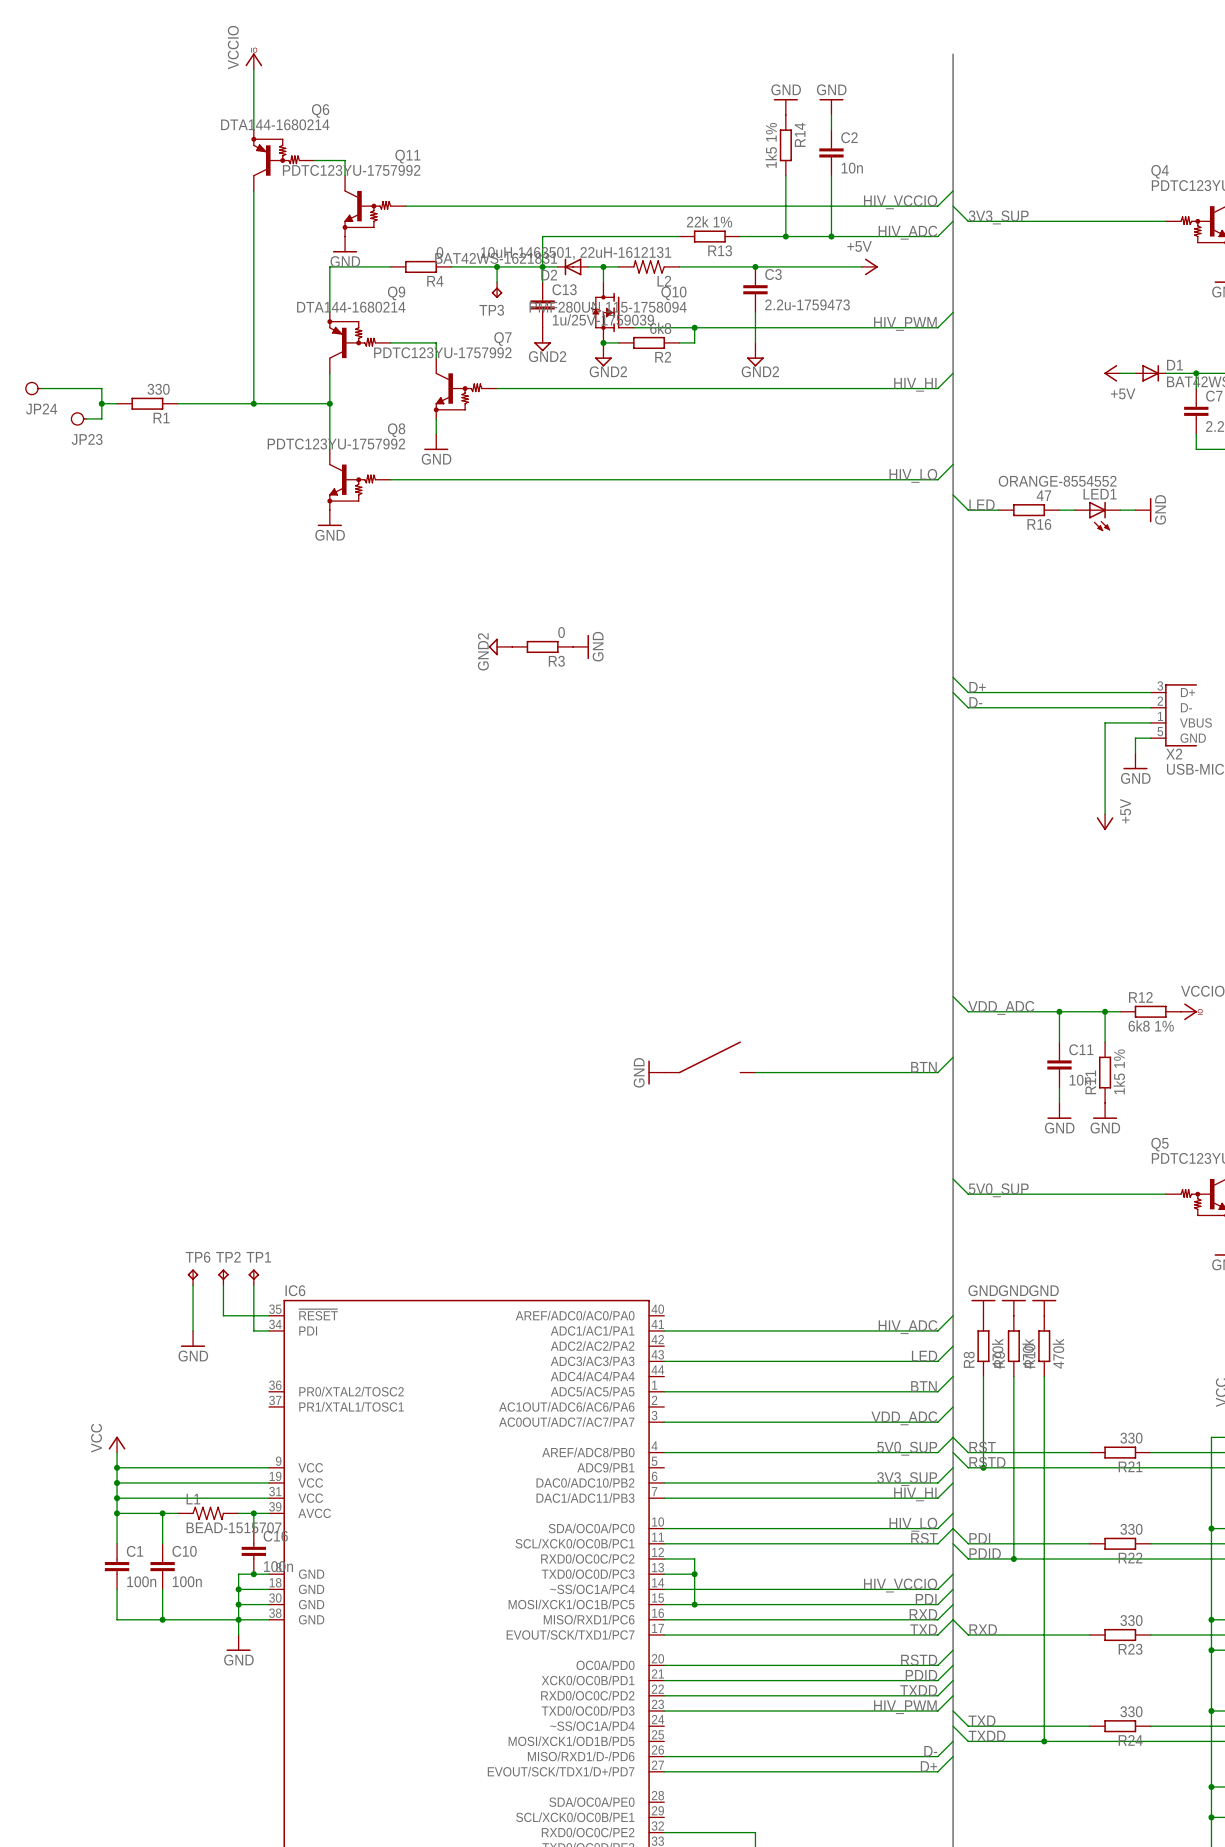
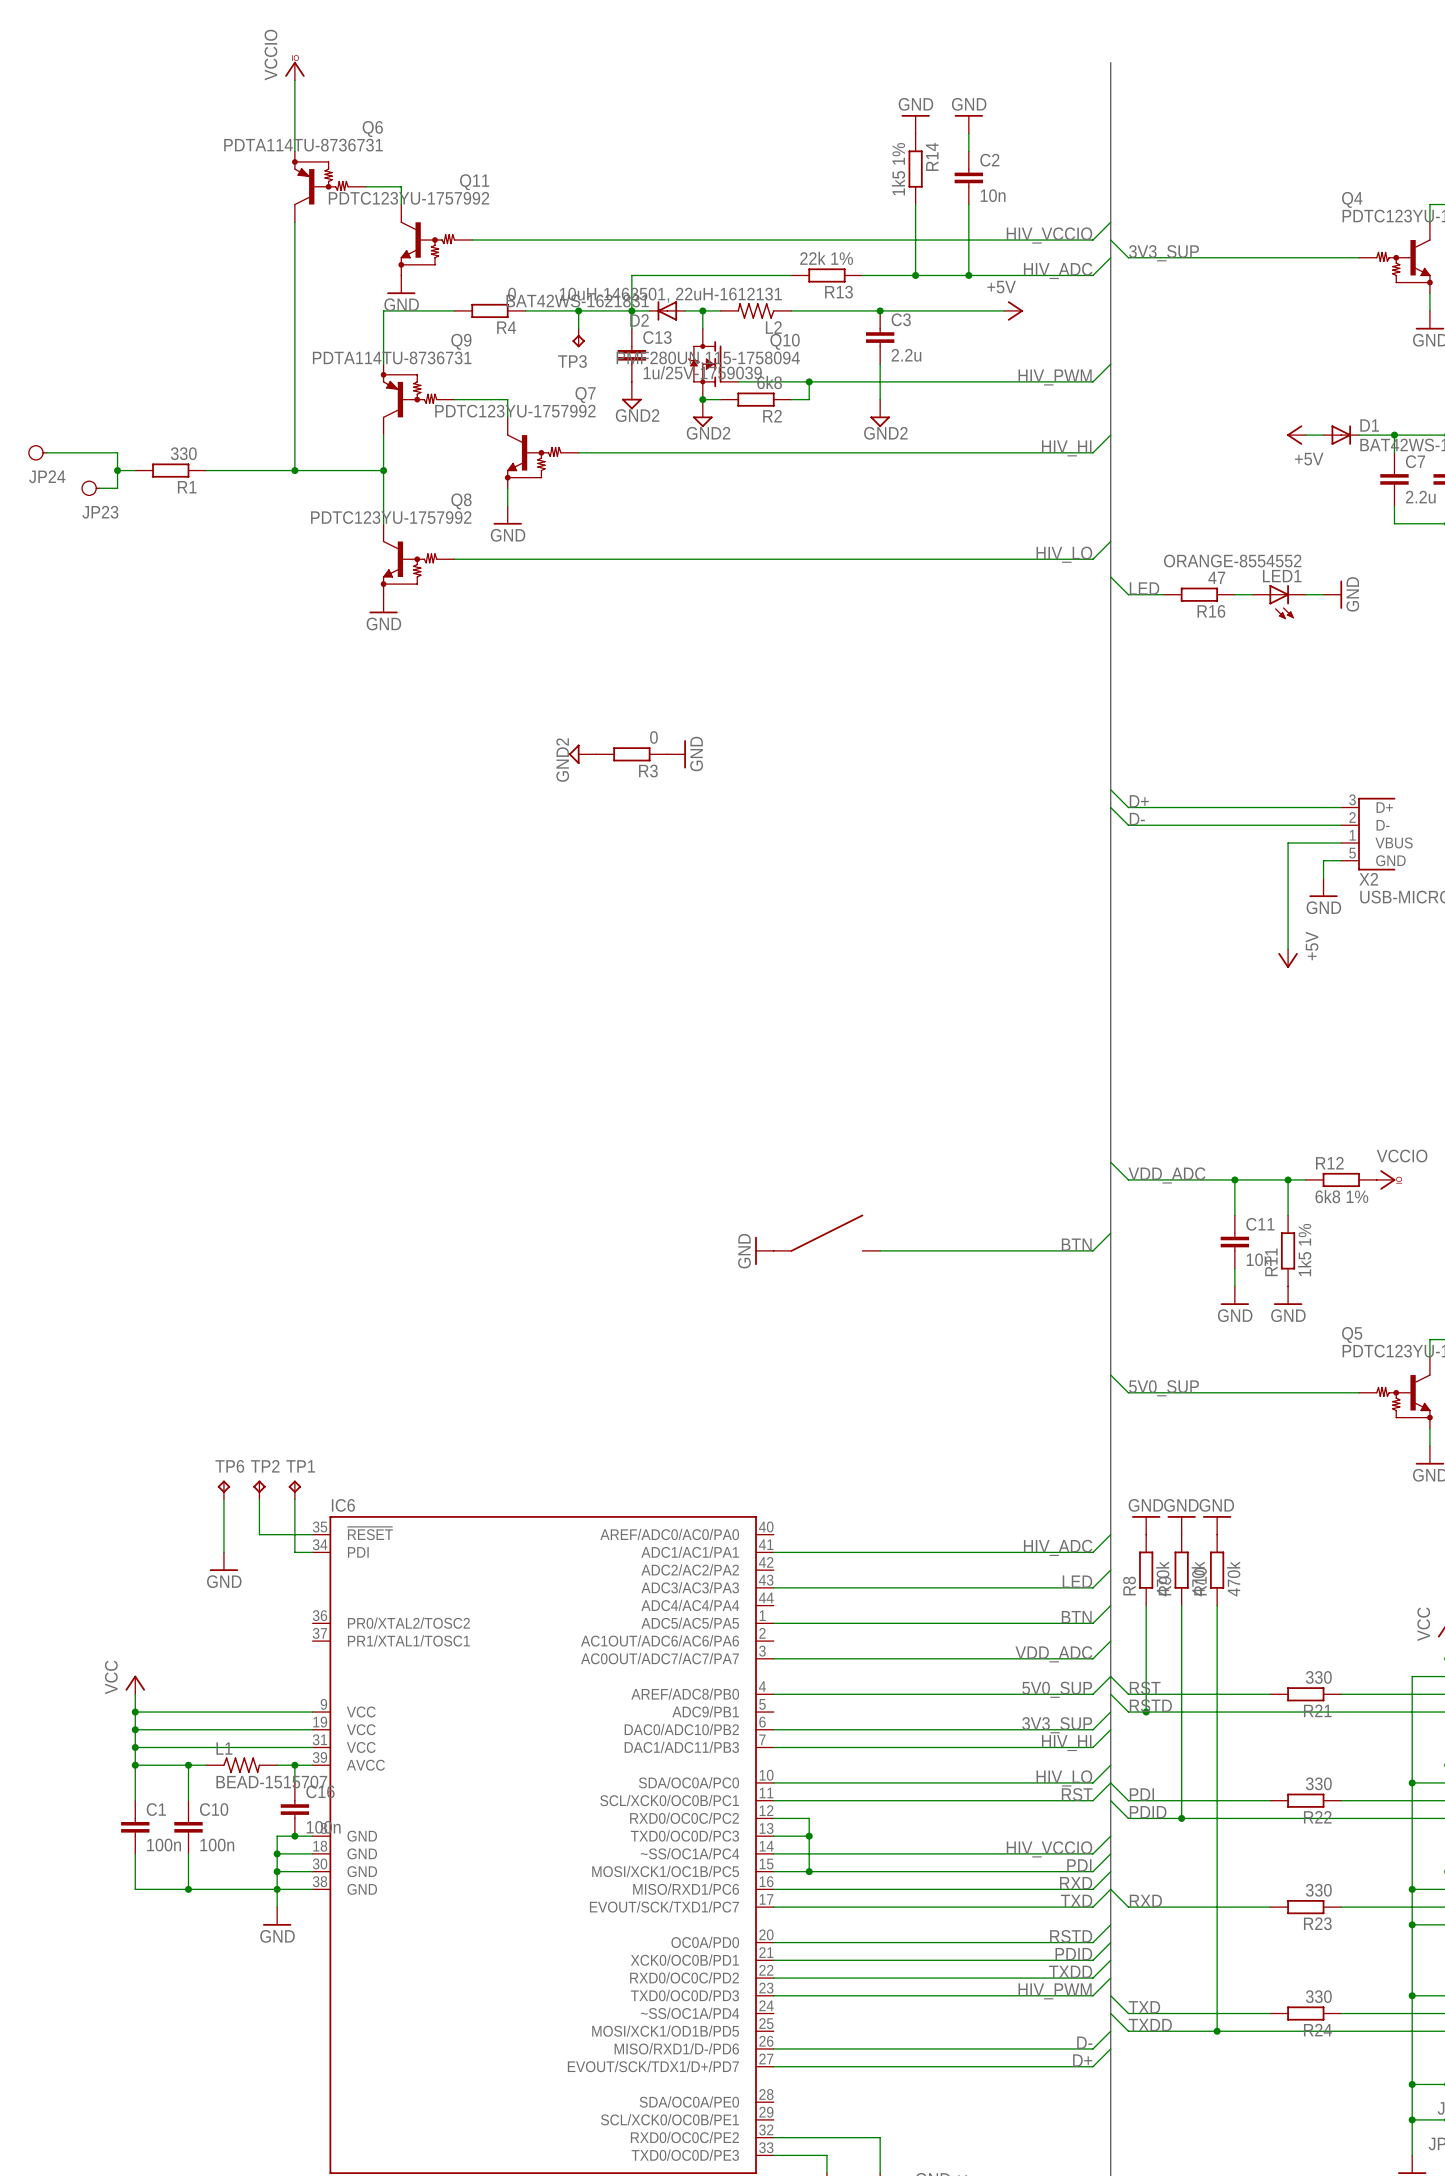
Q6 value: DTA144-1680214 (275, 124) -> PDTA114TU-8736731 (303, 145)
C3 value: 2.2u-1759473 (807, 304) -> 2.2u (906, 355)
Q9 value: DTA144-1680214 (351, 307) -> PDTA114TU-8736731 (392, 357)

